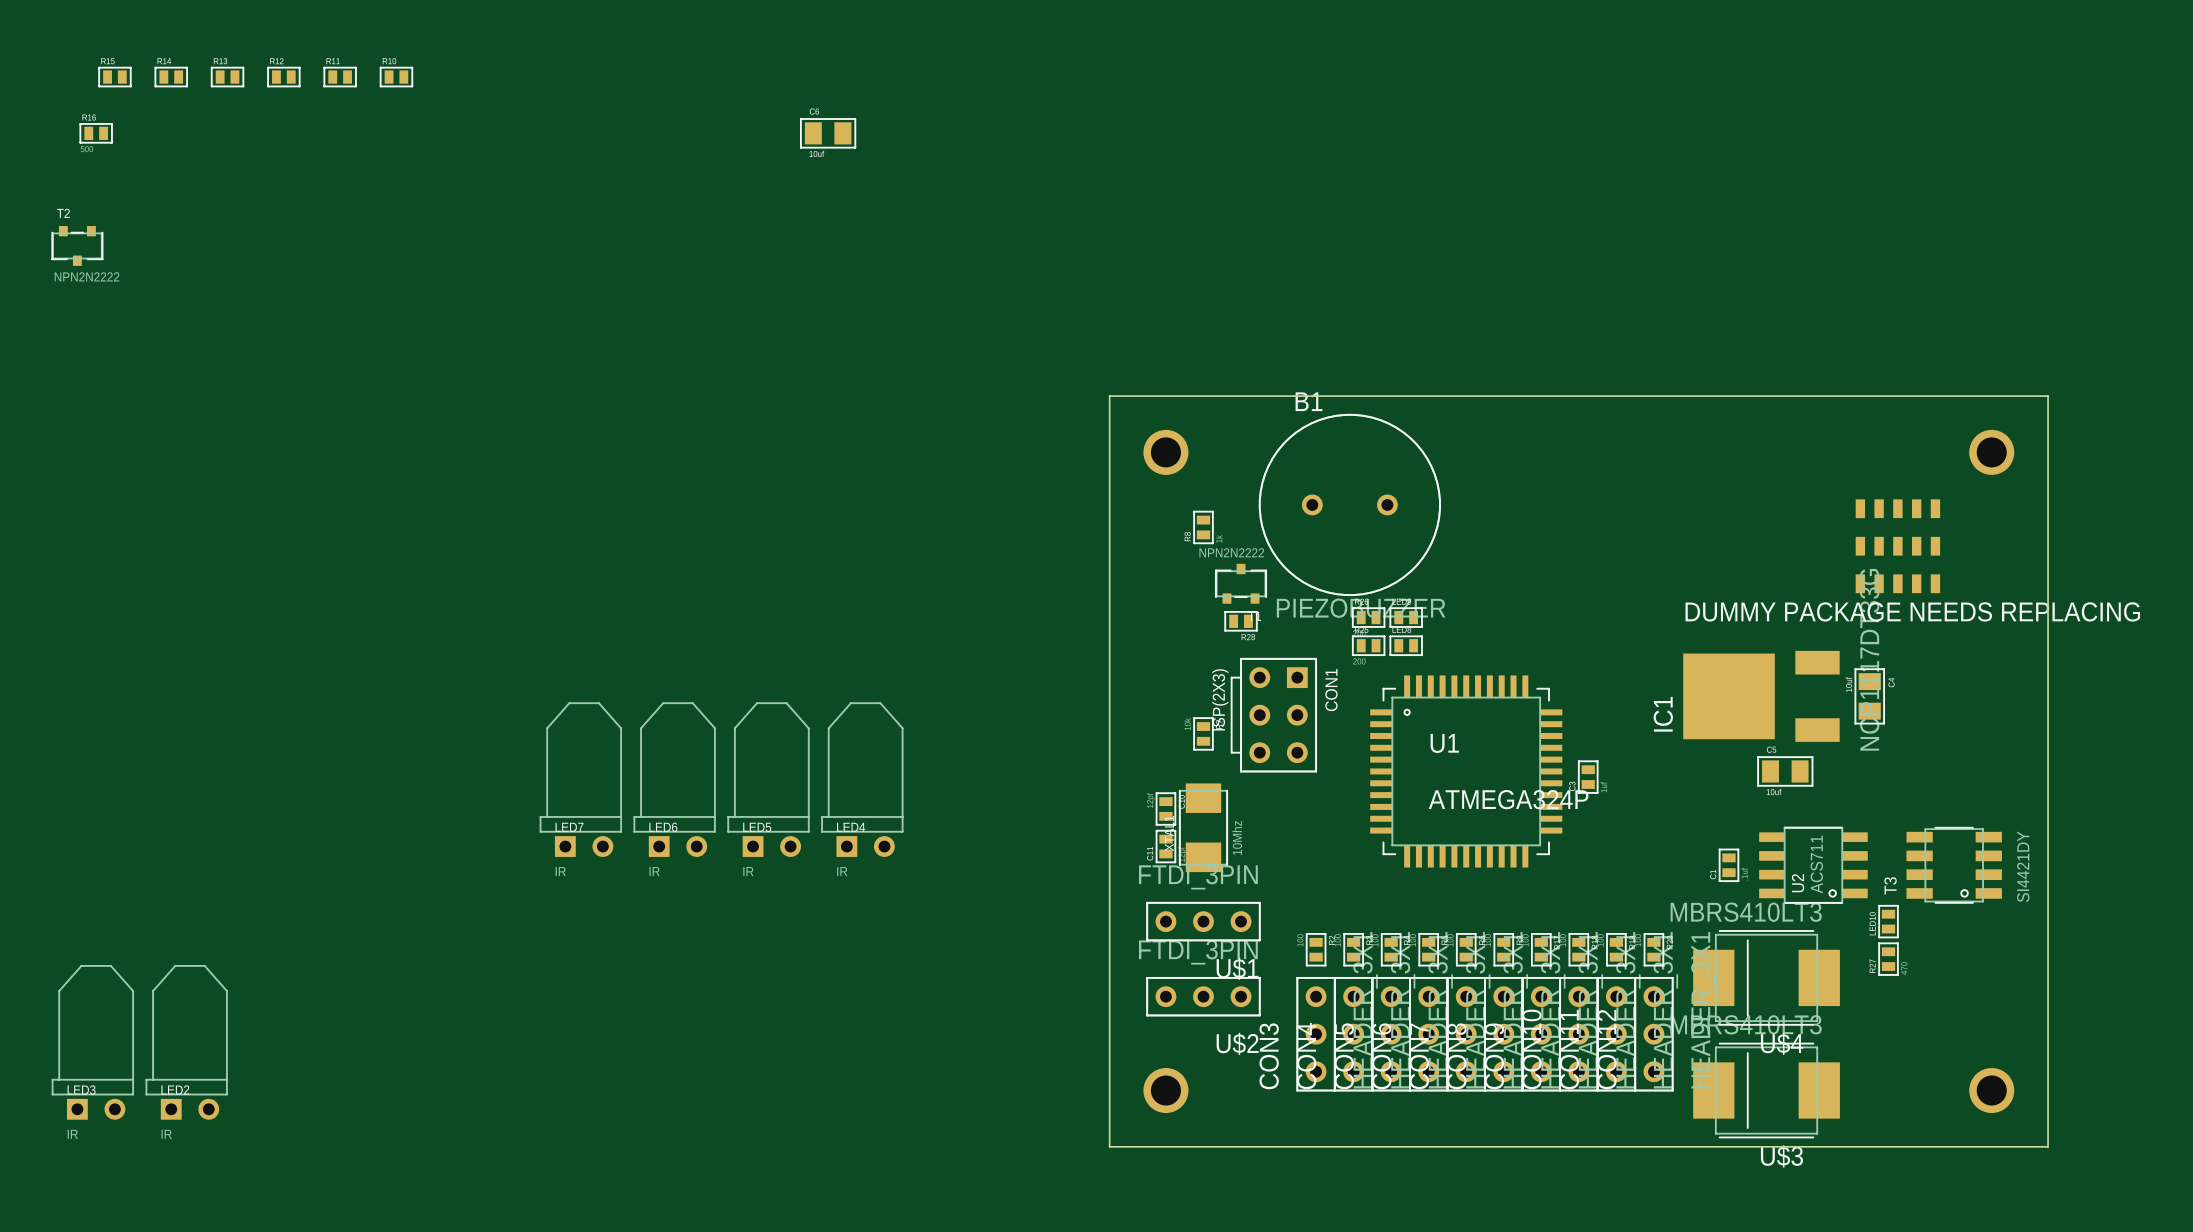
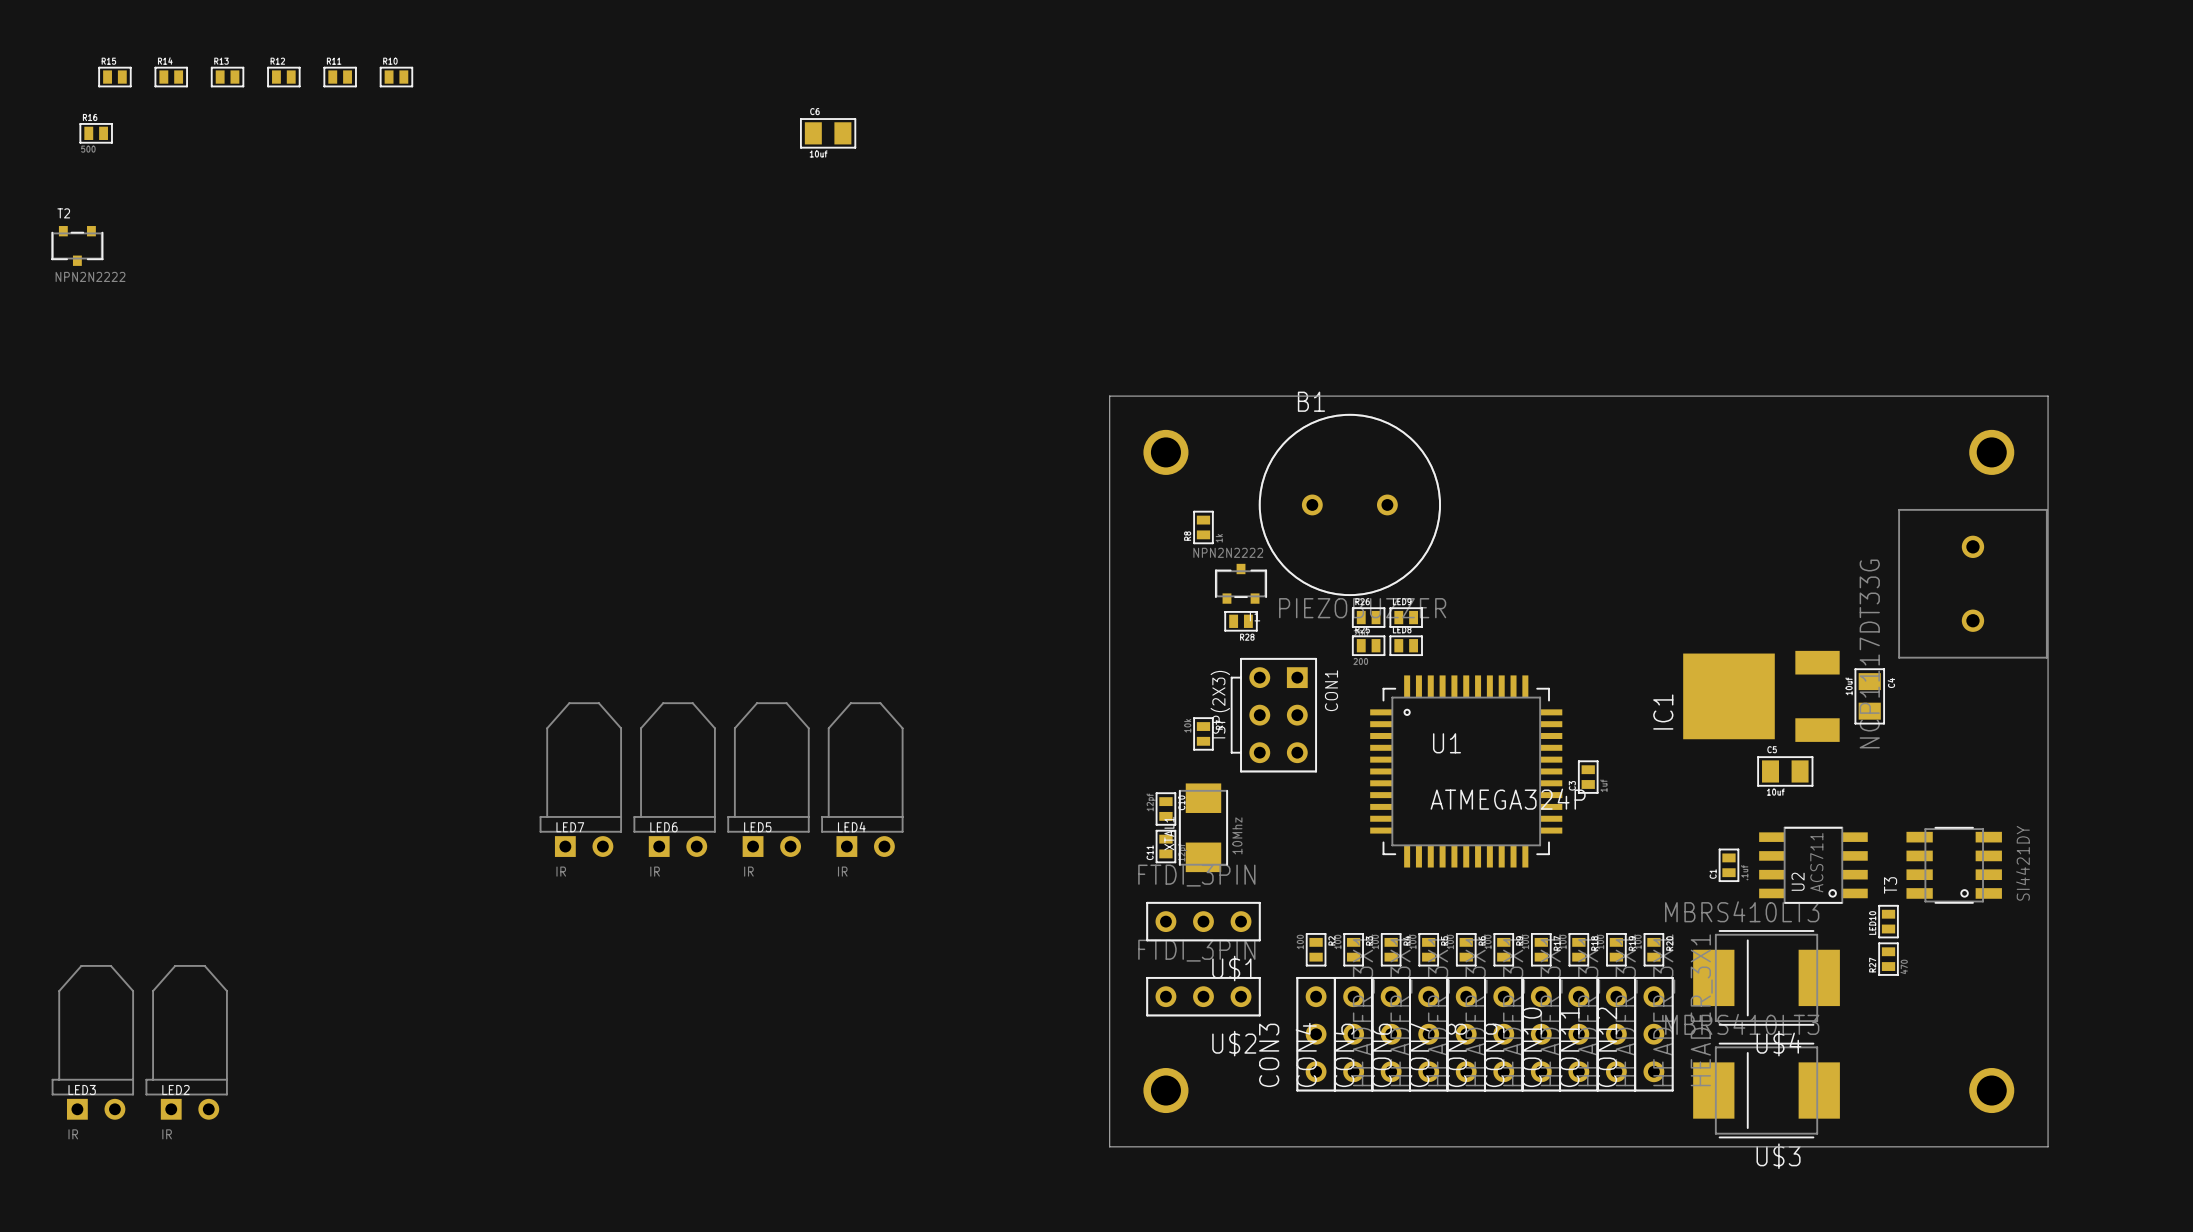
part: (1897, 546) -> none
part: none -> (1972, 583)

